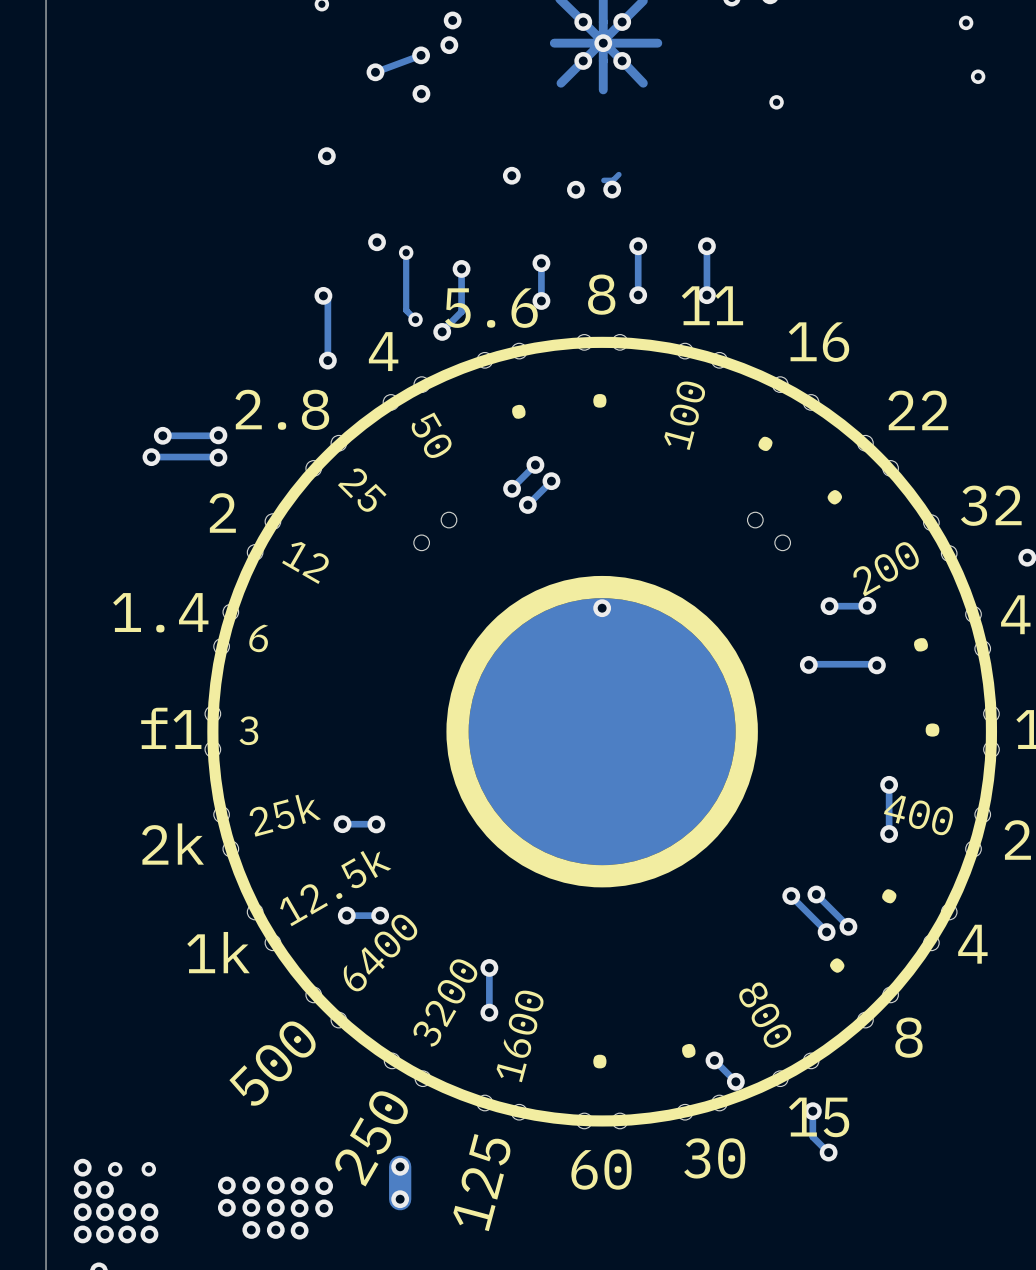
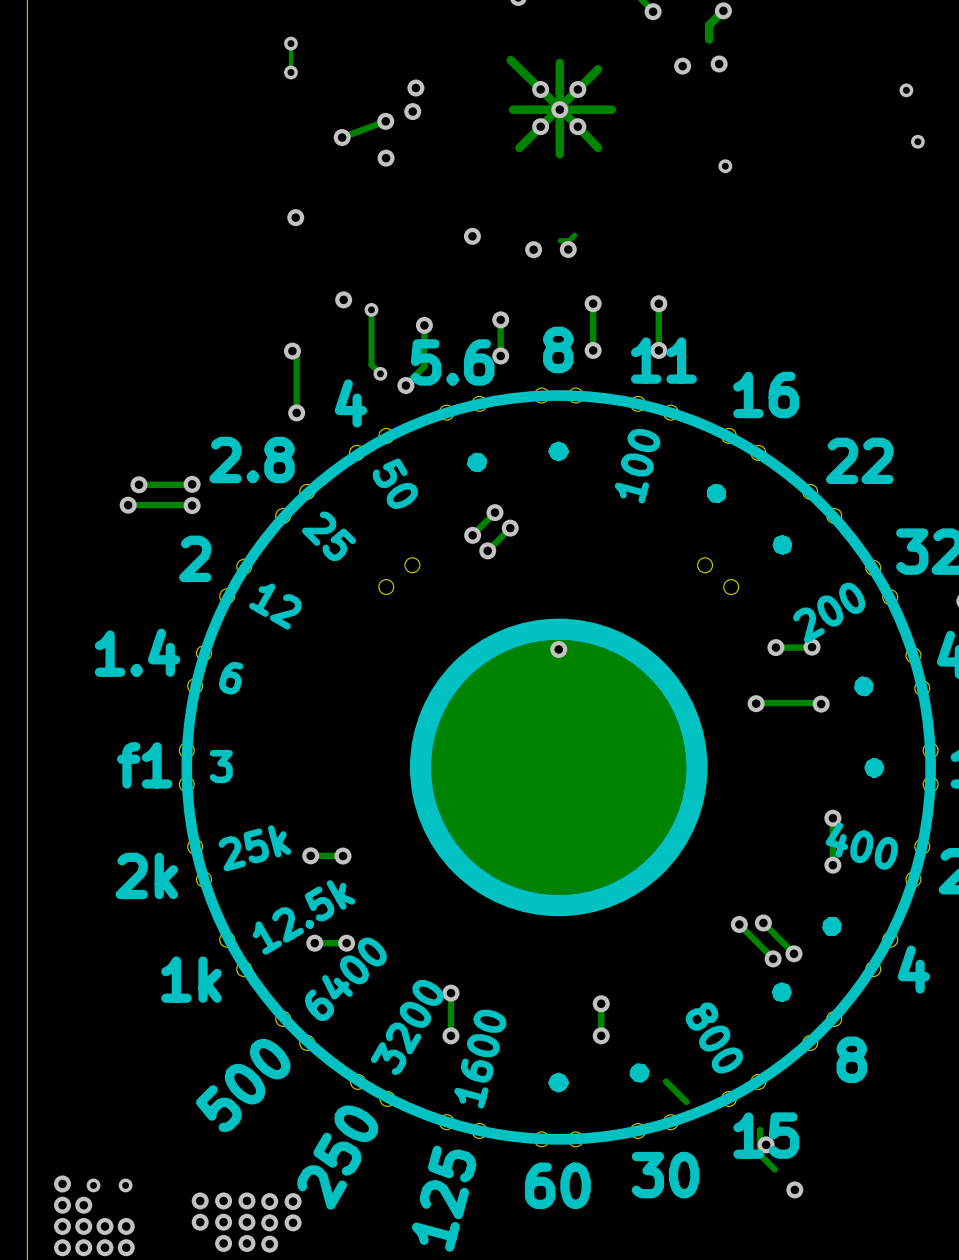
track: none -> (601, 1003) (601, 1035)
via: none -> (601, 1003)
via: none -> (601, 1035)
via: (714, 1060) -> none
via: (735, 1081) -> none
via position: (812, 1111) -> (766, 1144)
via: (828, 1152) -> none
track: (400, 1166) (400, 1199) -> none
via: (400, 1166) -> none
via: none -> (794, 1189)
via: (400, 1199) -> none

